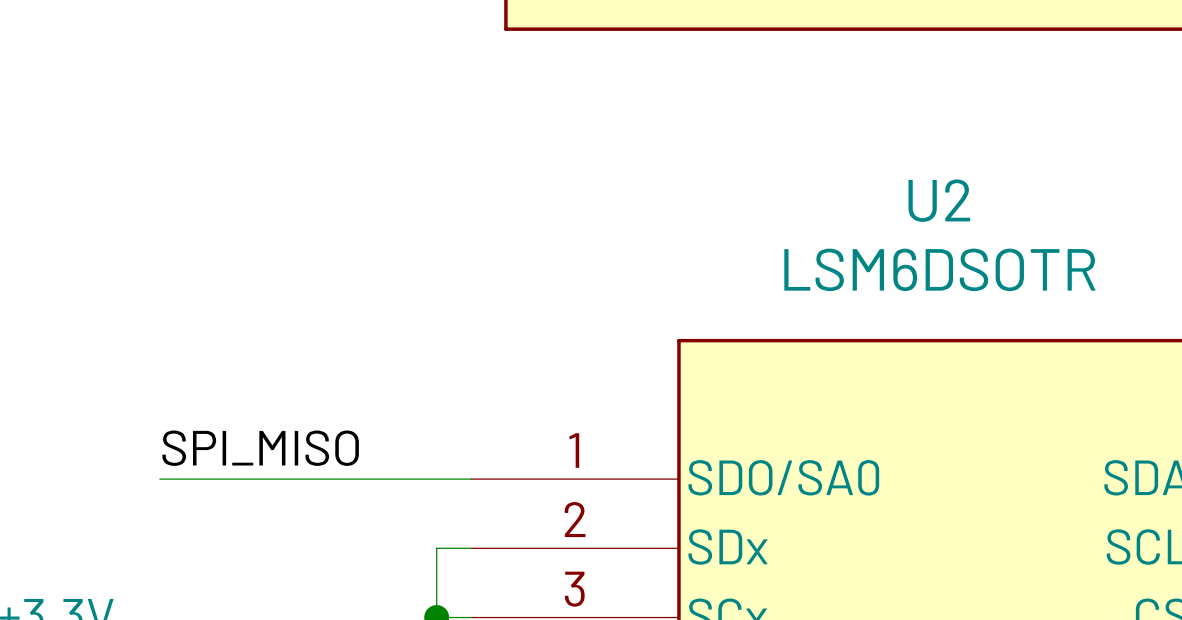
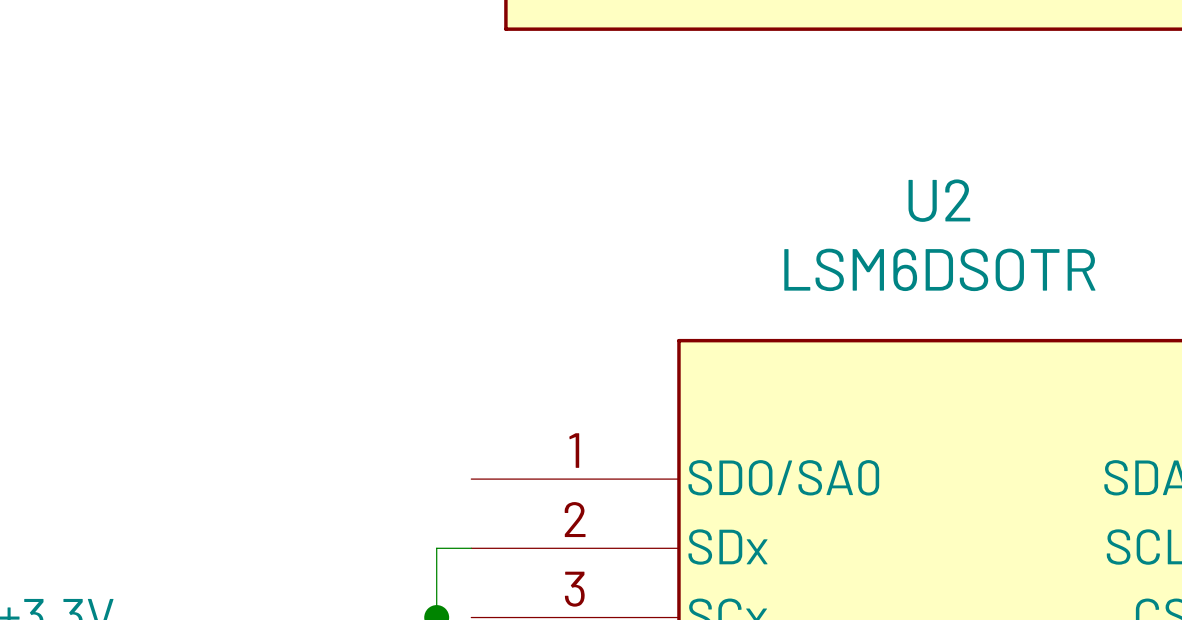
label: SPI_MISO (260, 448) -> none
wire: (159, 479) (471, 479) -> none
wire: (436, 617) (471, 617) -> none

